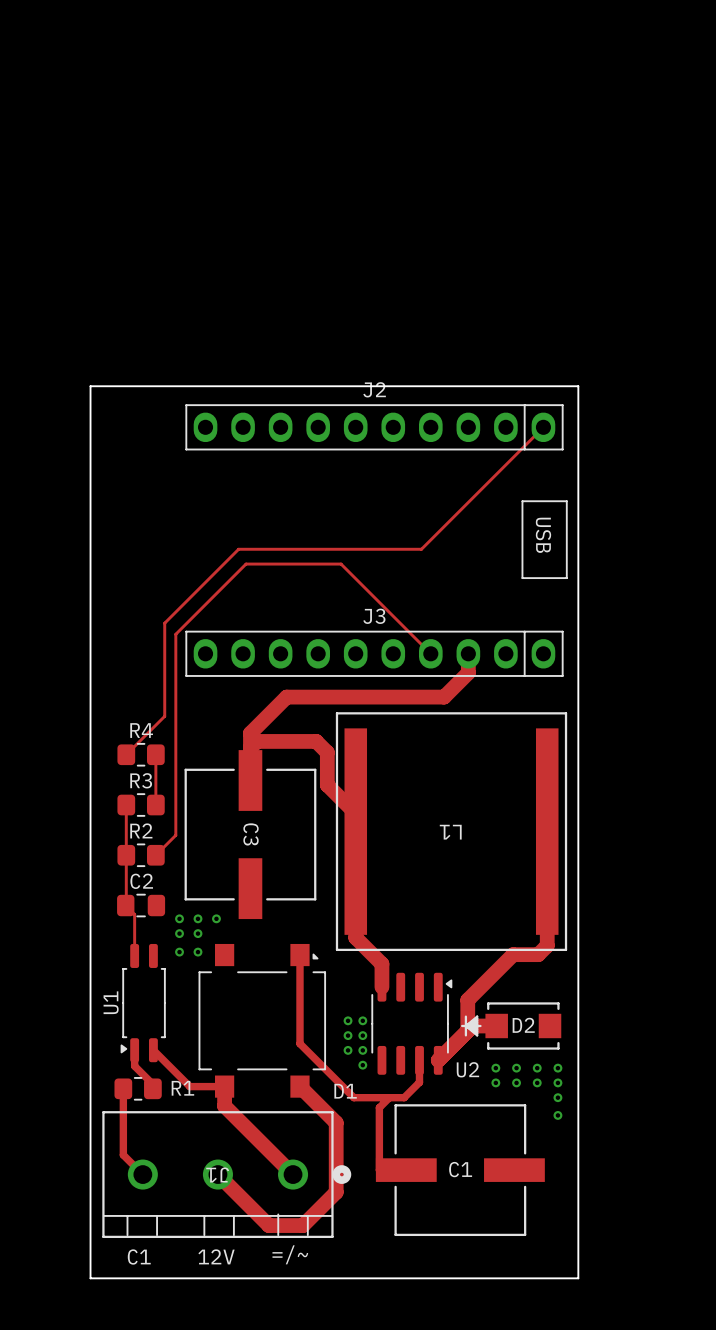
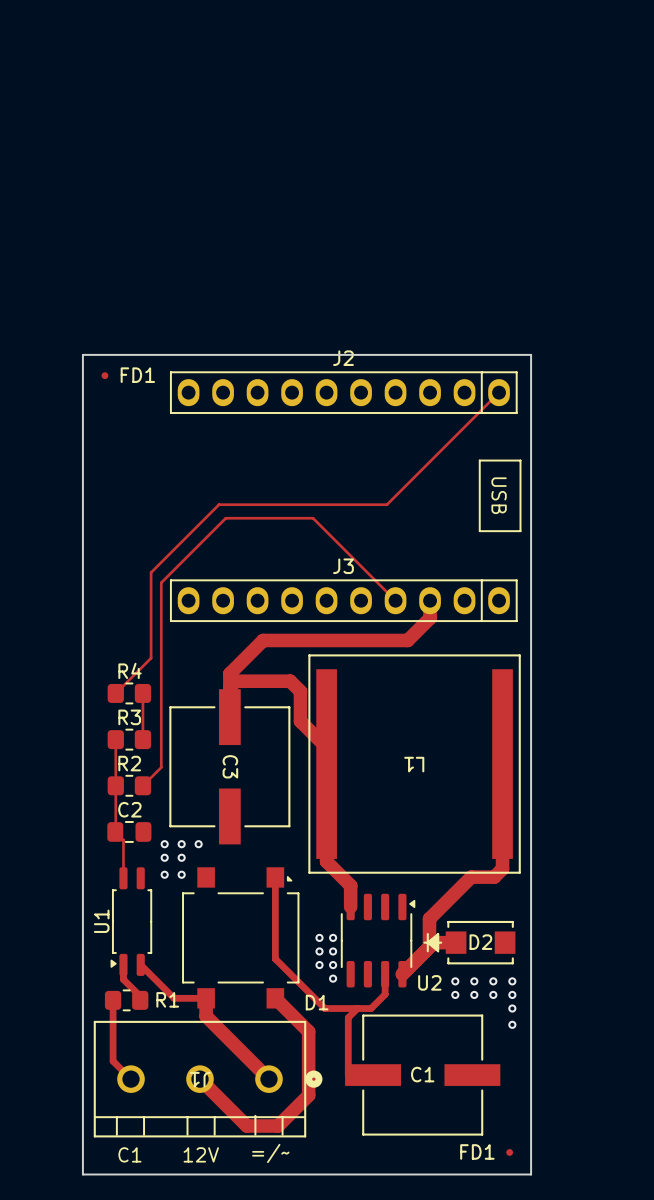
FD1: none -> (104, 375)
FD1: none -> (509, 1152)

